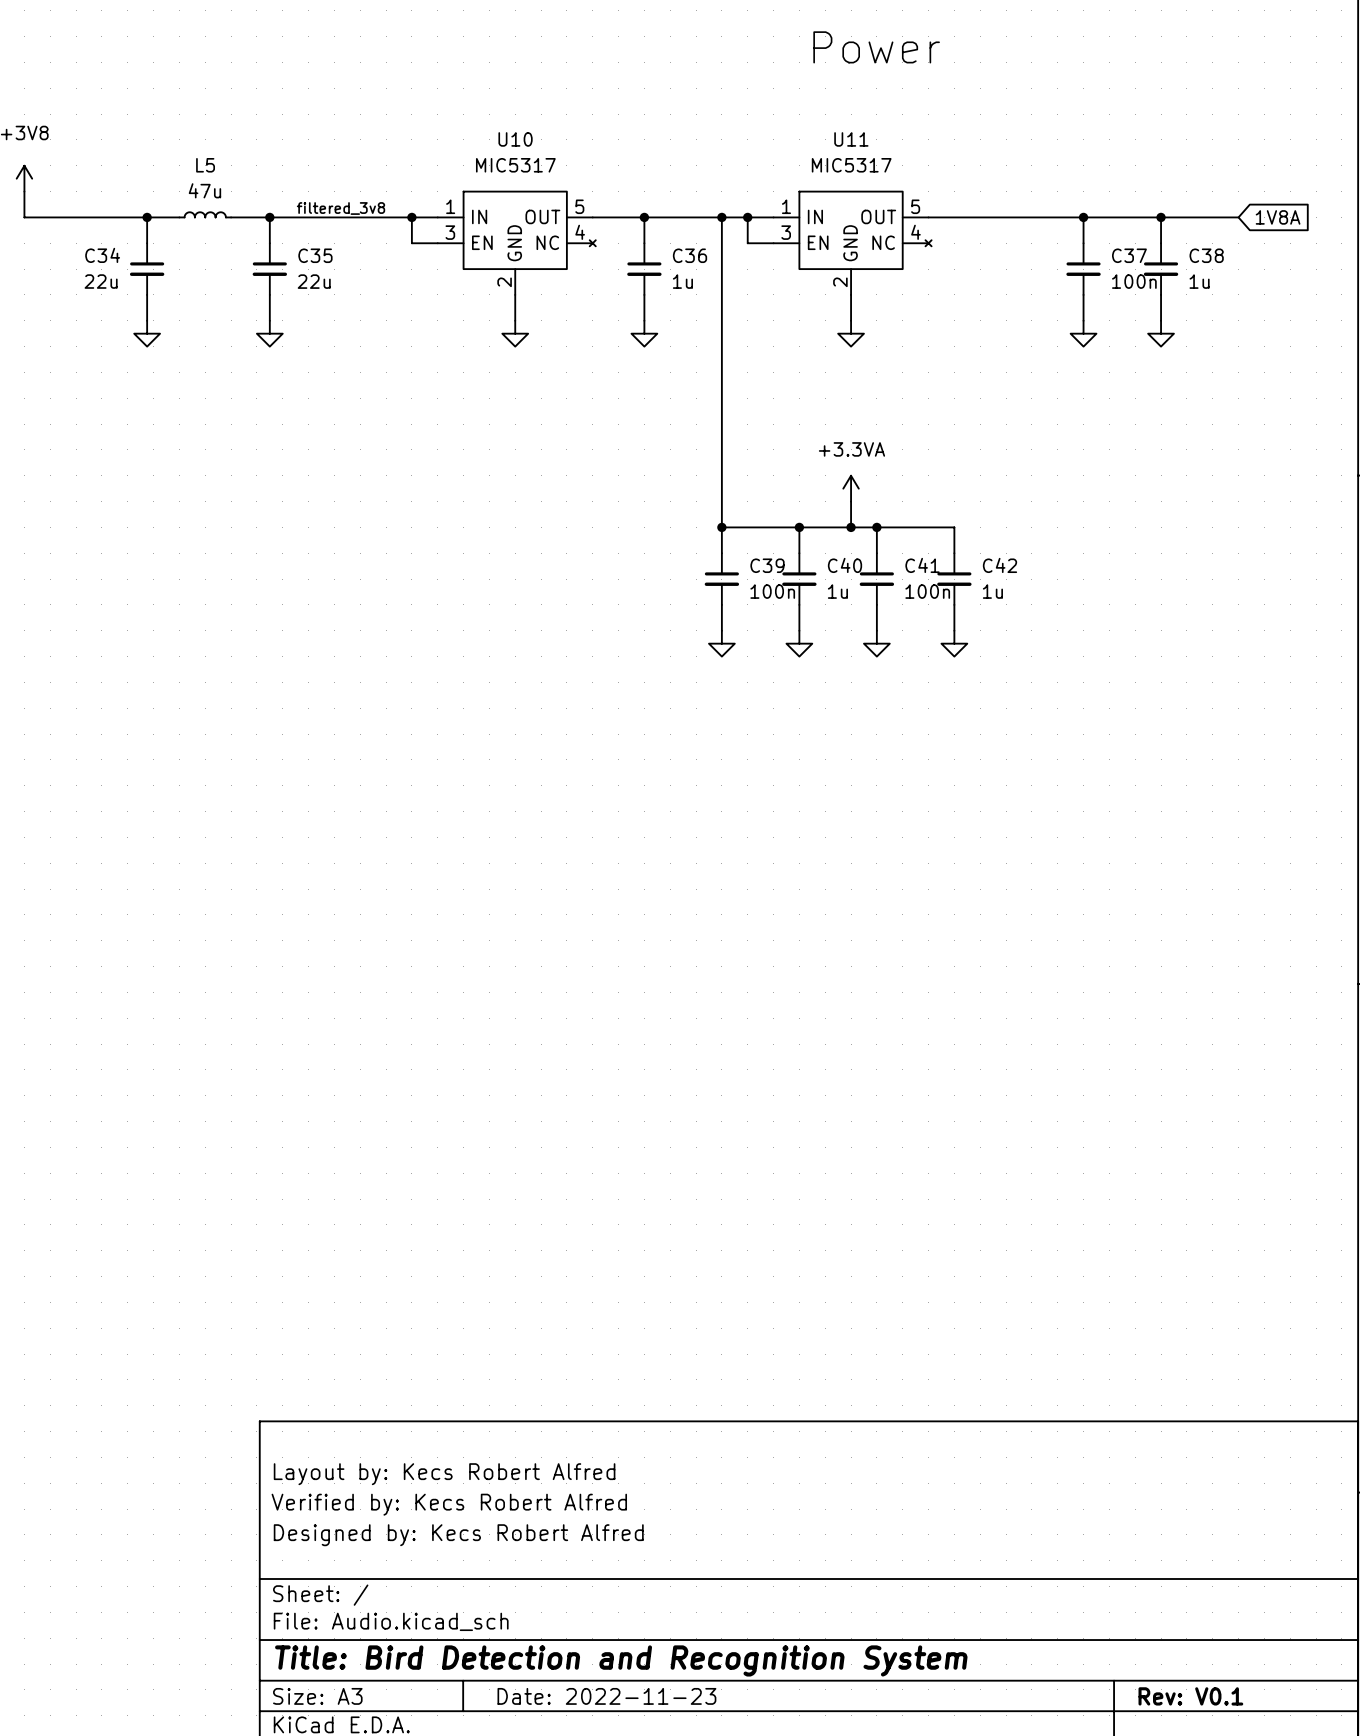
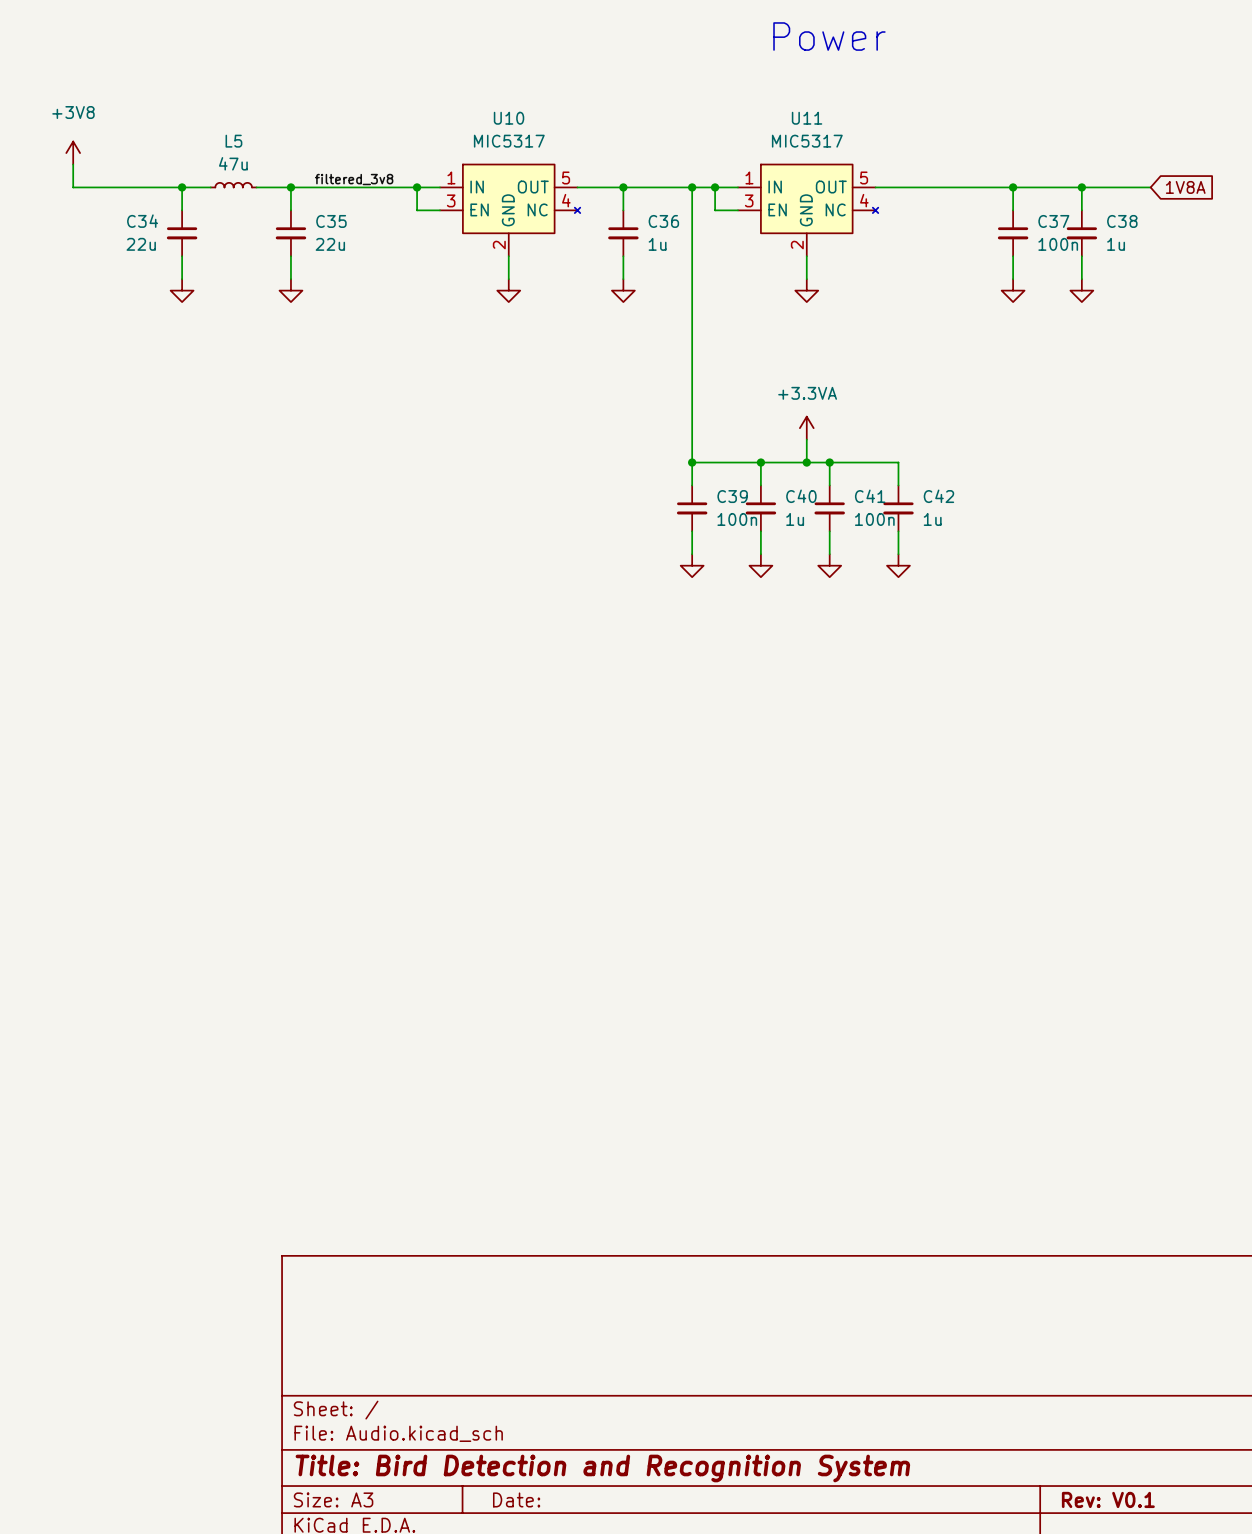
title block: Layout by: Kecs Robert Alfred (444, 1474) -> none
title block: Verified by: Kecs Robert Alfred (449, 1504) -> none
title block: Designed by: Kecs Robert Alfred (458, 1535) -> none
title block: Date: 2022-11-23 (606, 1696) -> Date: (516, 1499)

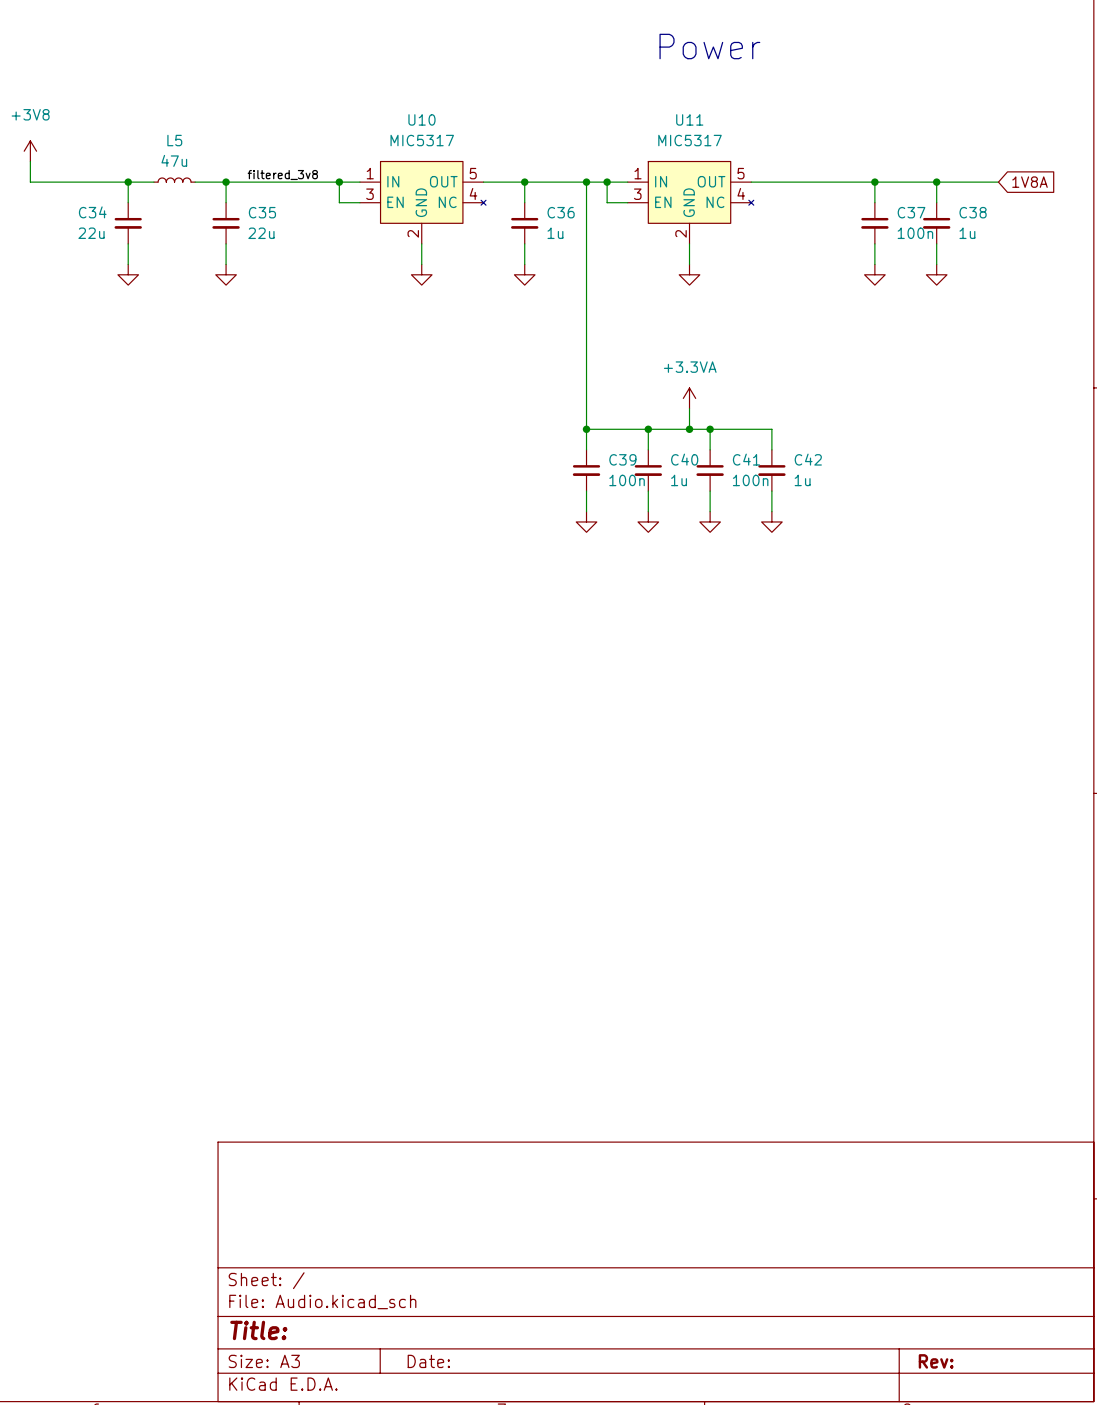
title block: Title: Bird Detection and Recognition System (602, 1468) -> Title: (258, 1330)
title block: Rev: V0.1 (1108, 1499) -> Rev: (936, 1361)

